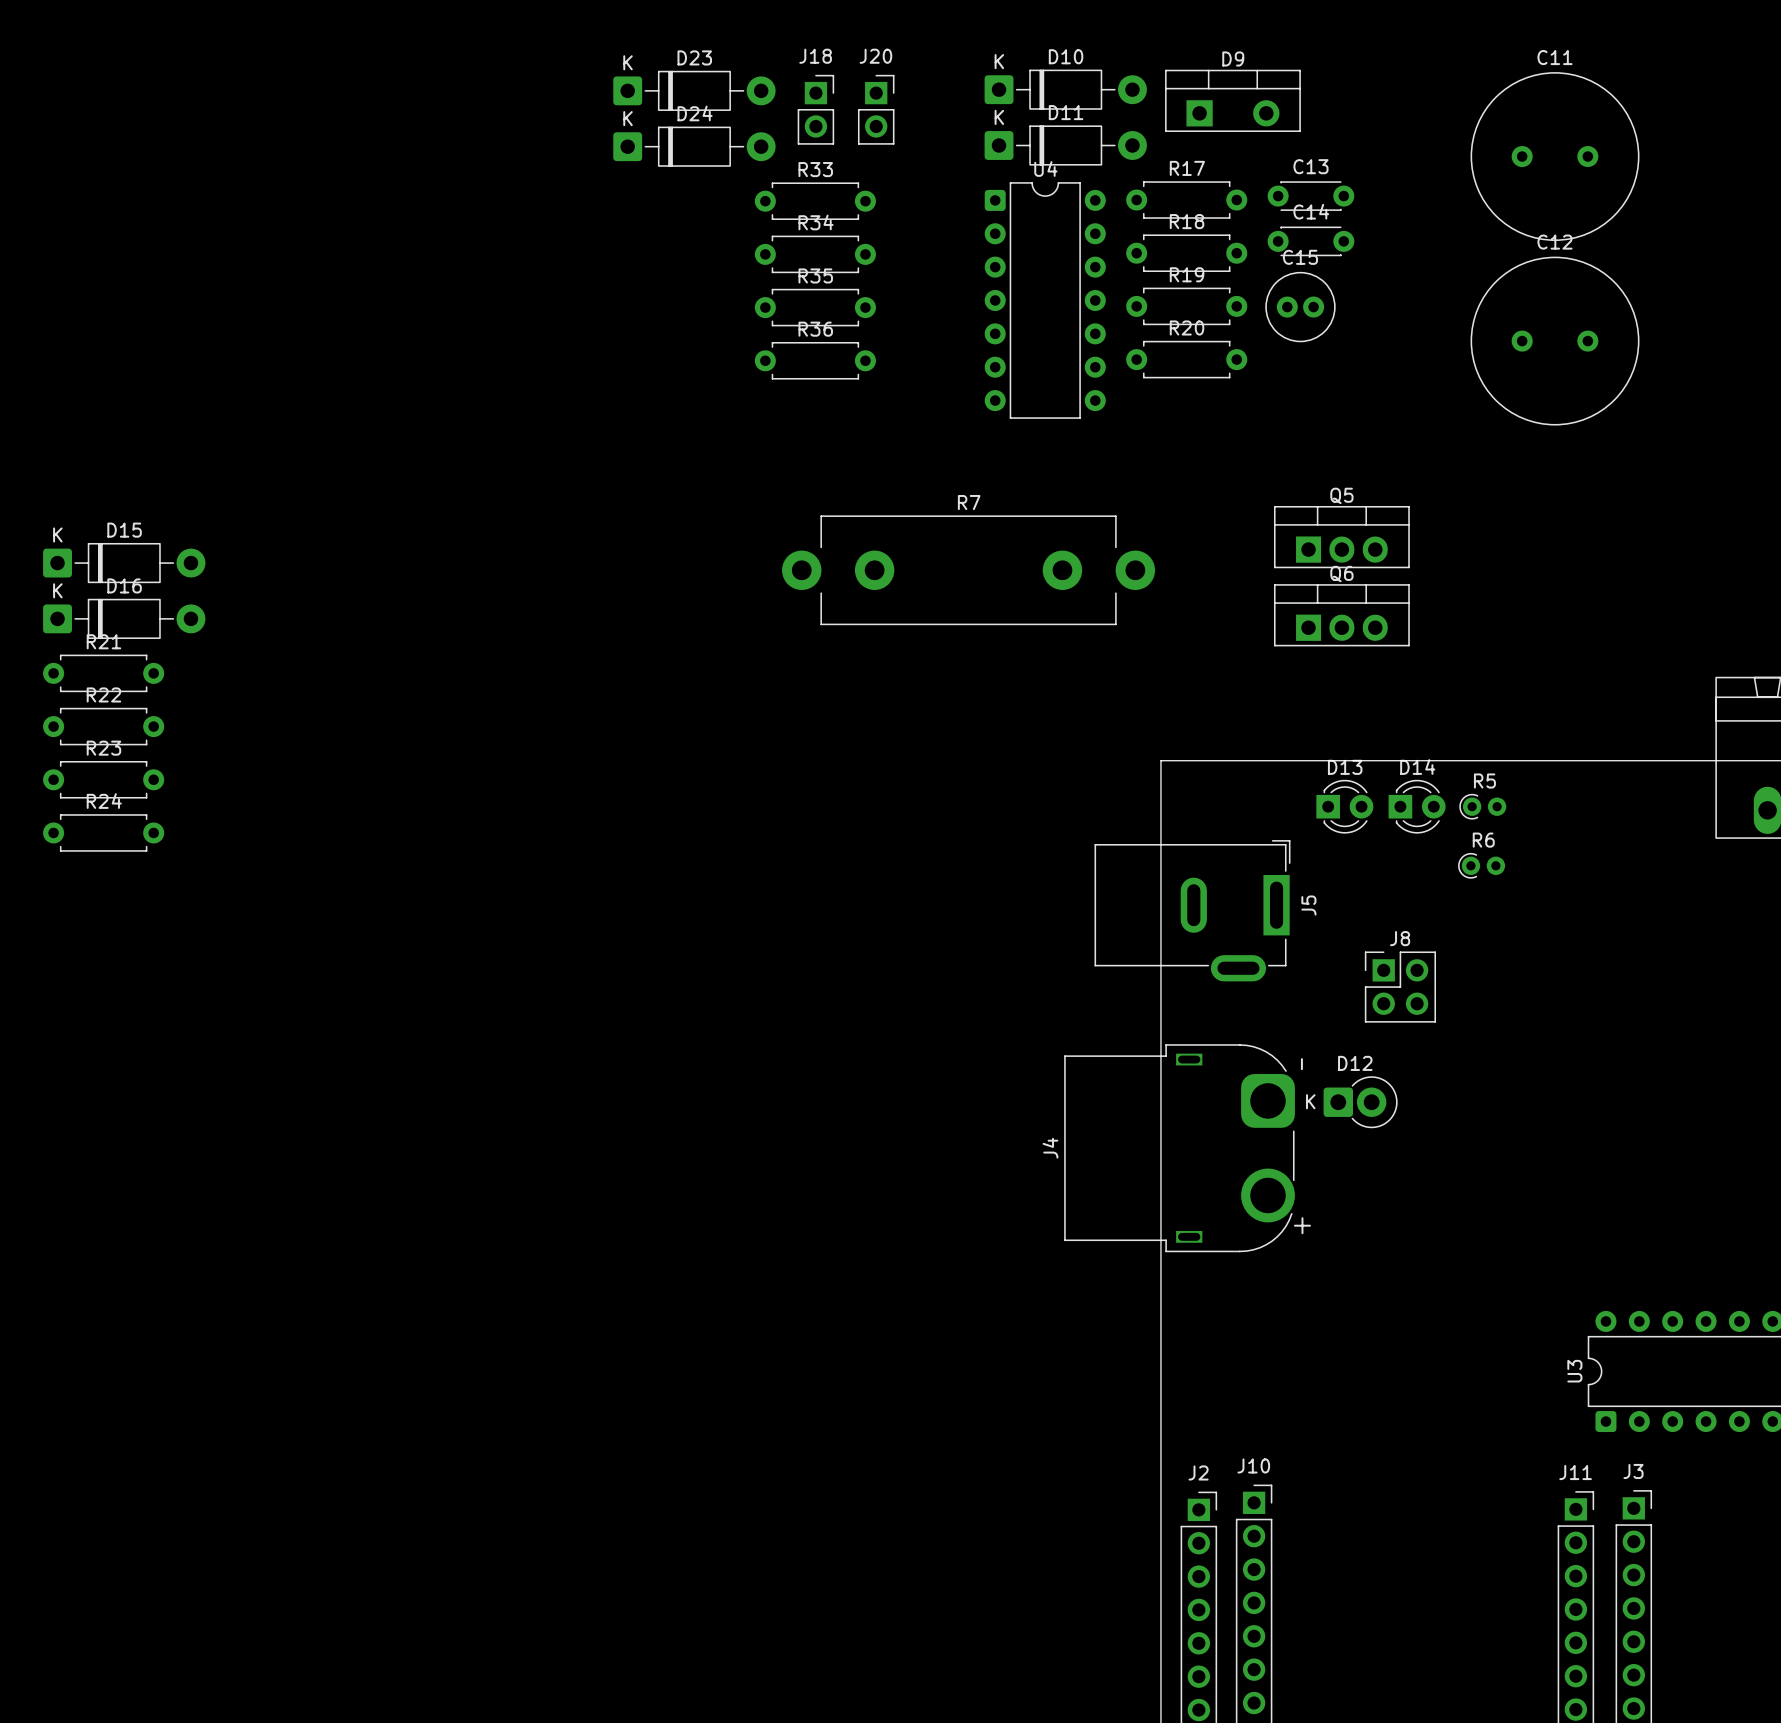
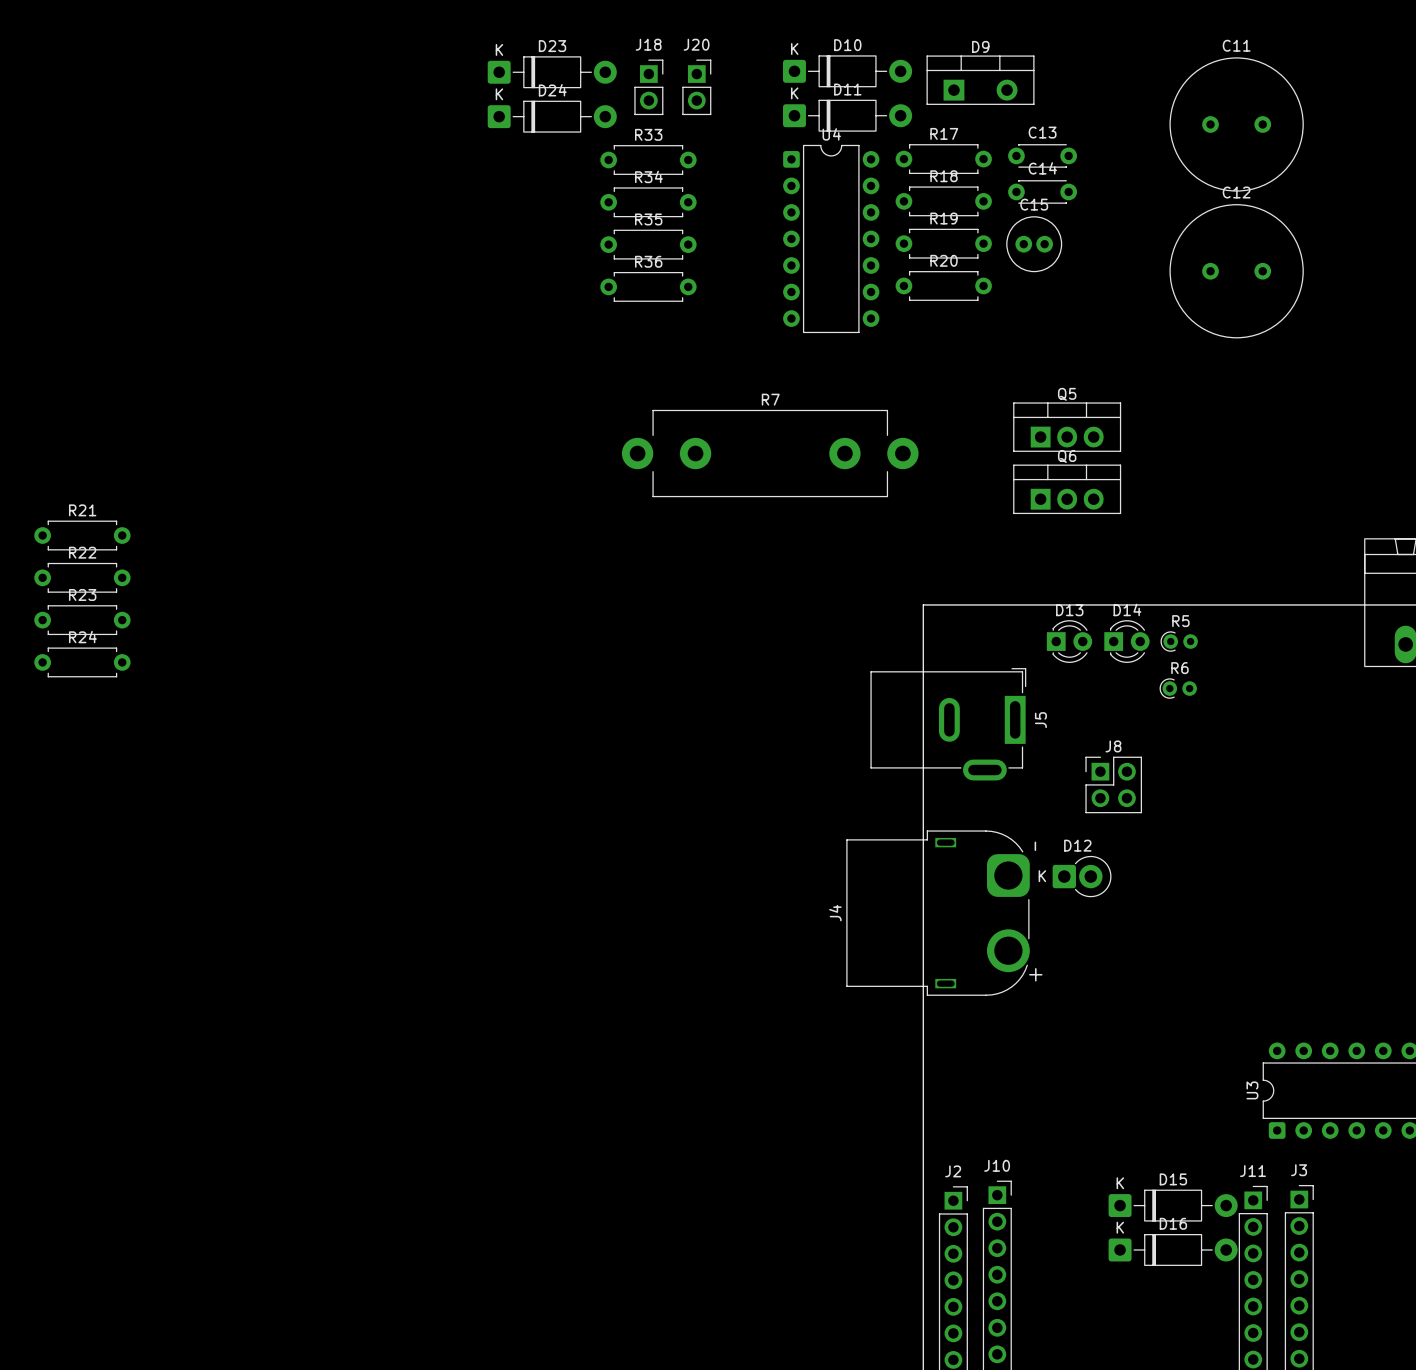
D15 position: (124, 563) -> (1173, 1205)
D16 position: (124, 618) -> (1173, 1249)

